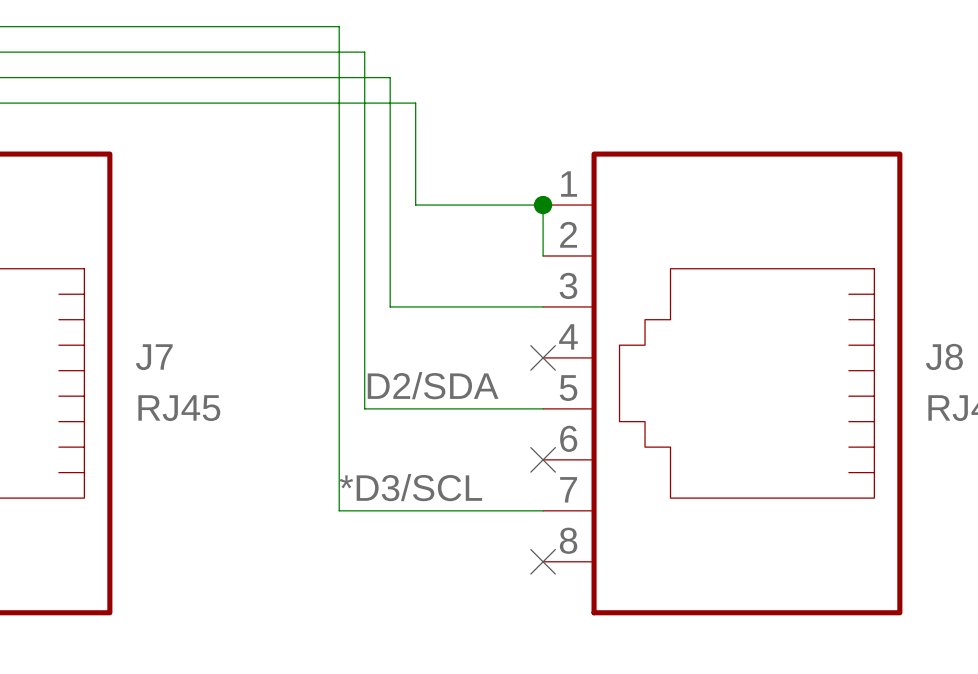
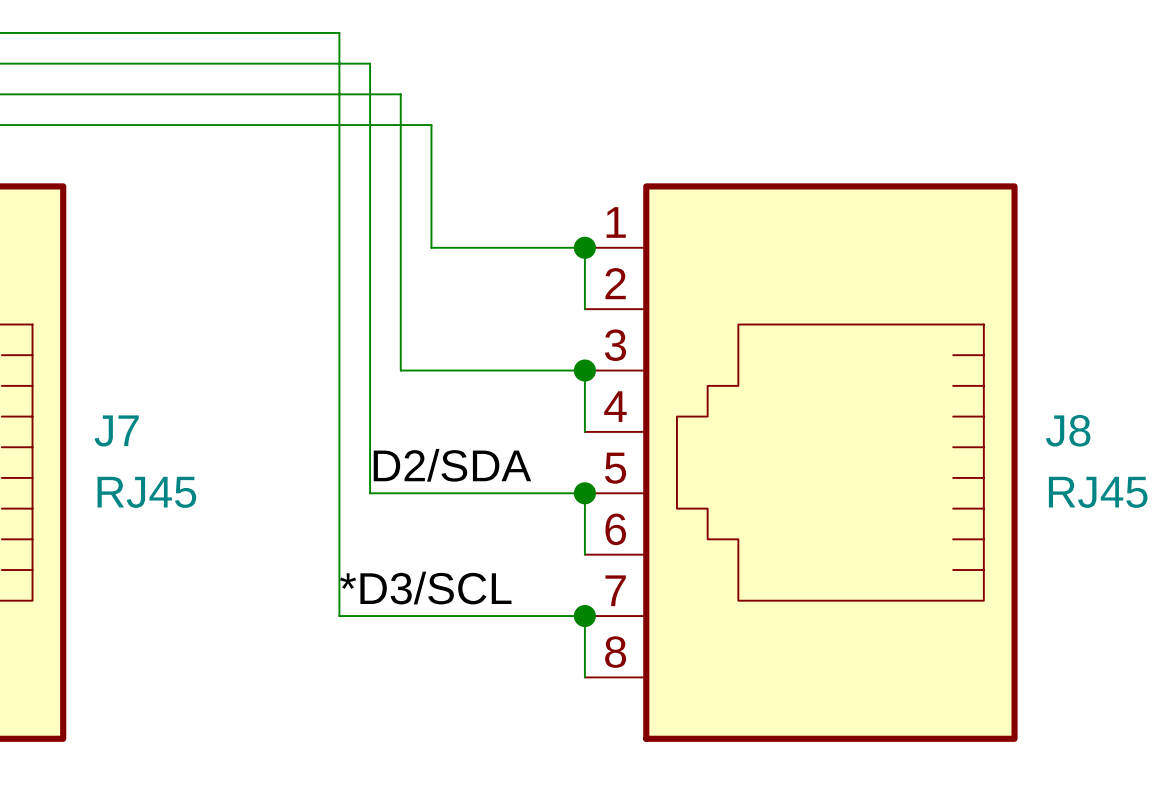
wire: none -> (584, 370) (584, 431)
junction: none -> (584, 370)
no-connect mark: (543, 357) -> none
wire: none -> (584, 493) (584, 554)
junction: none -> (584, 493)
no-connect mark: (543, 459) -> none
wire: none -> (584, 616) (584, 677)
junction: none -> (584, 616)
no-connect mark: (543, 561) -> none

